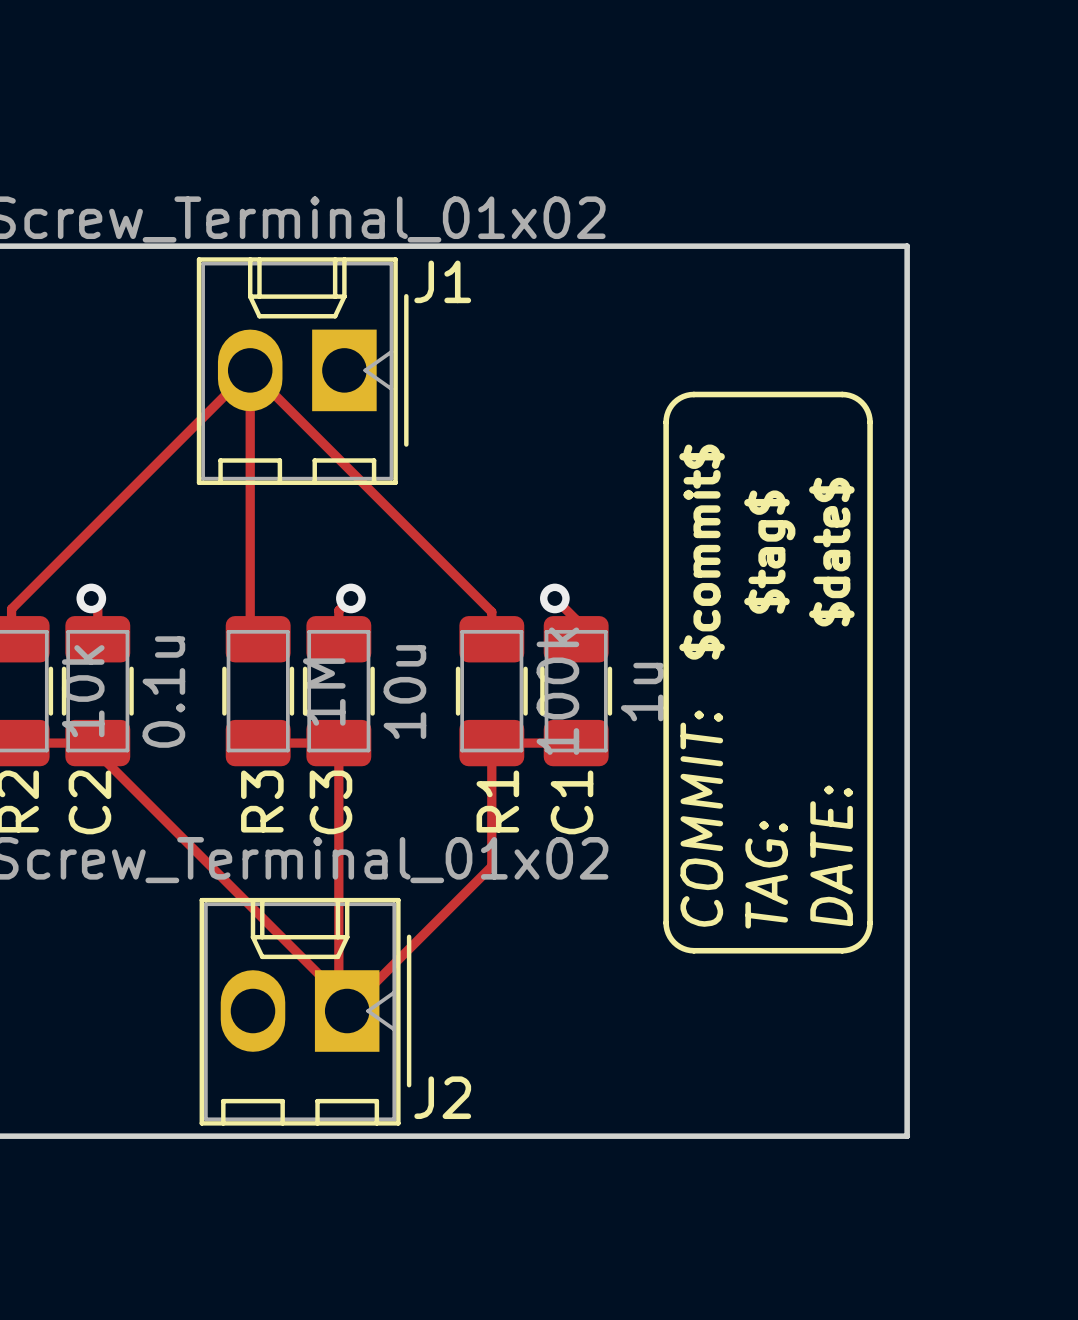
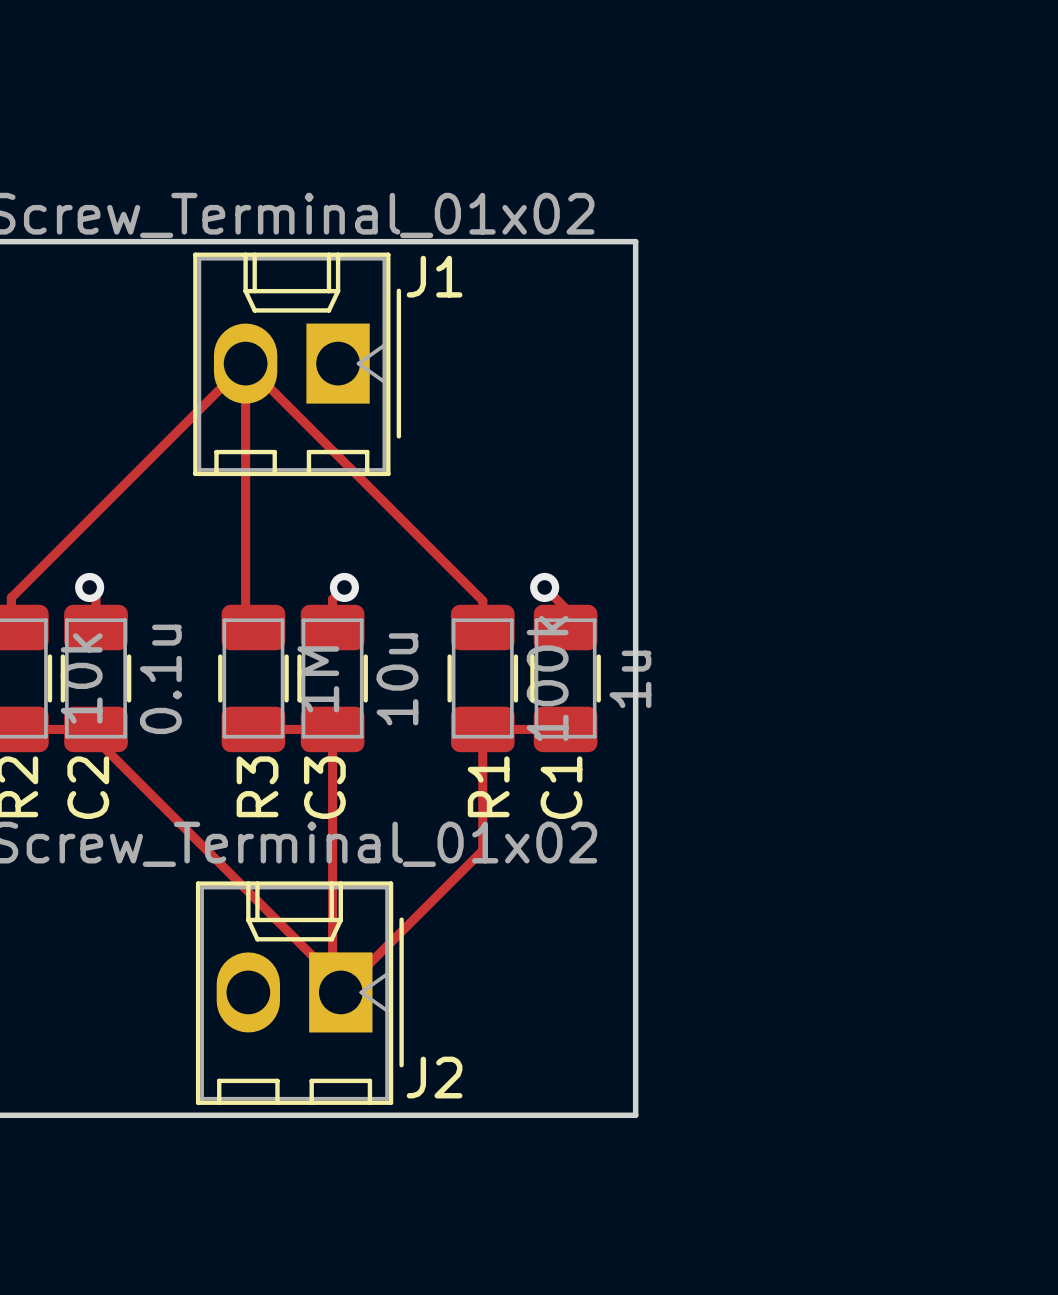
board edge: (647, 246) (907, 246) (907, 1136) (647, 1136) -> (635, 241) (635, 1115)
drawing: [663, 391, 873, 954] -> none

